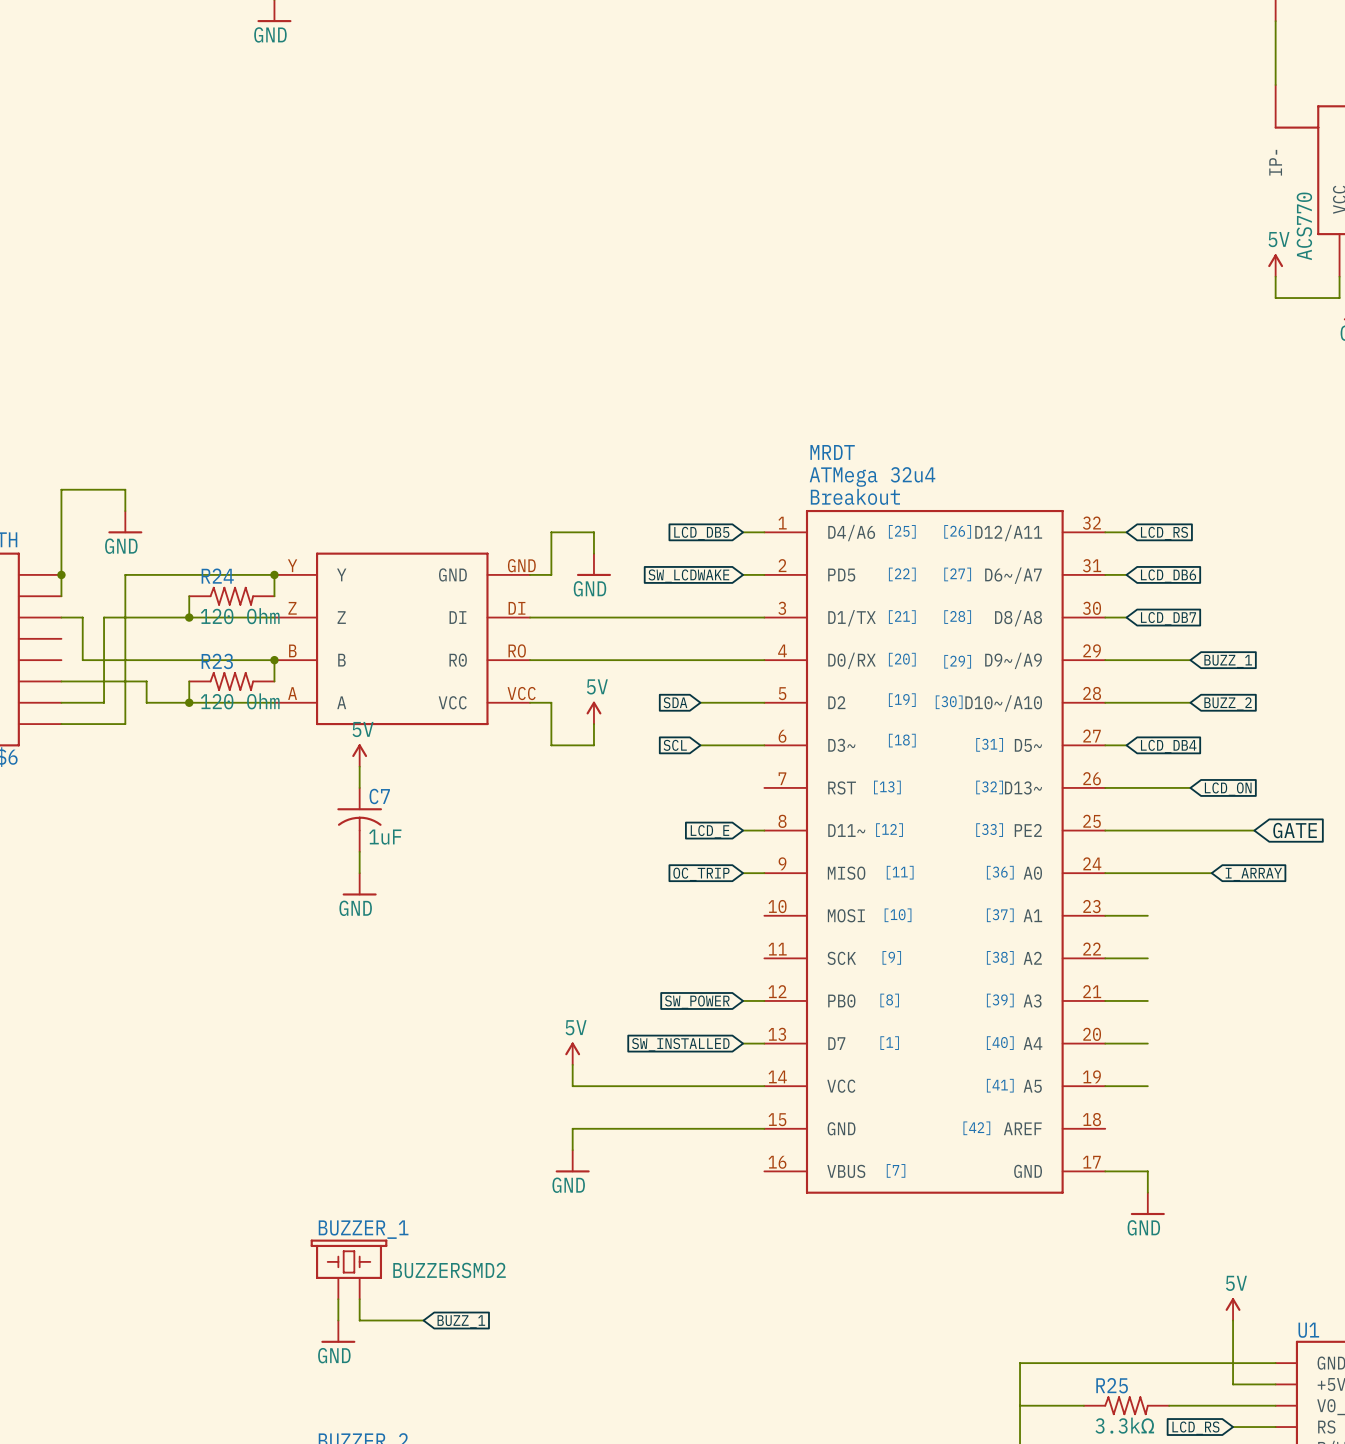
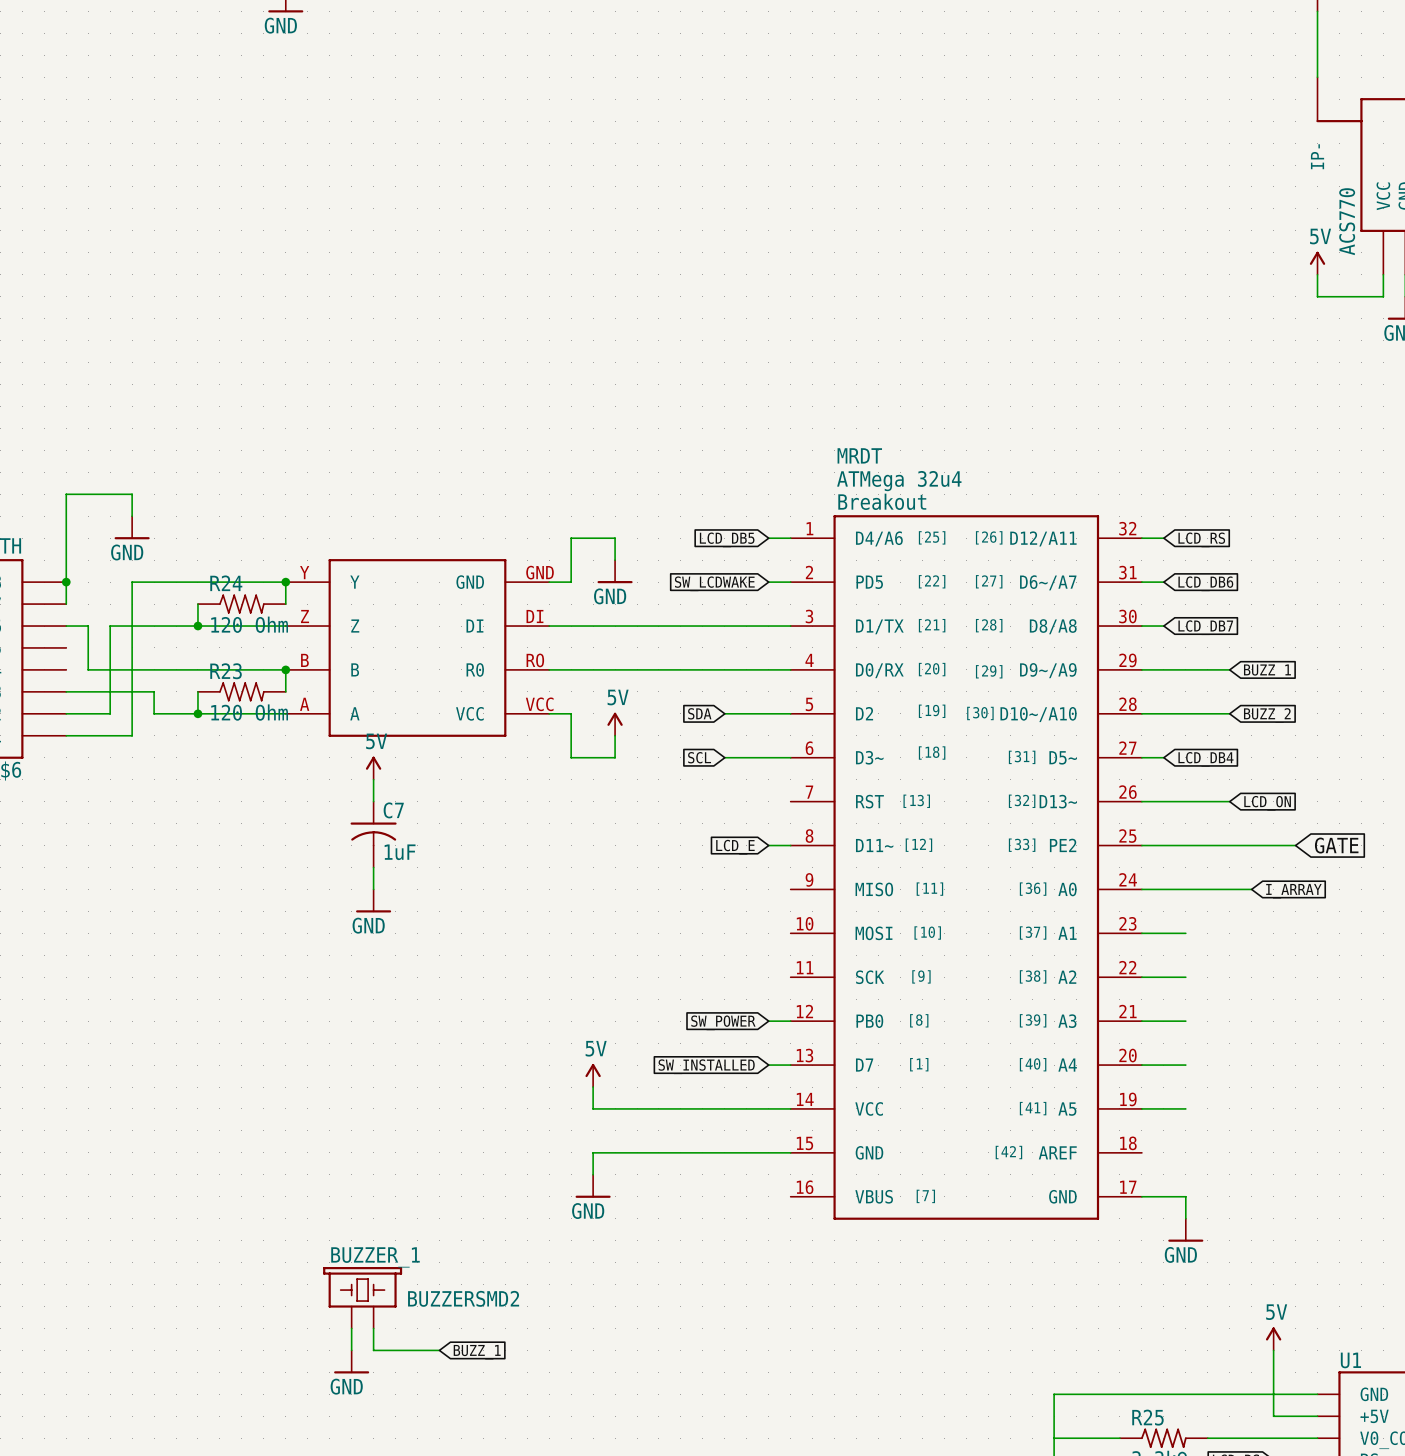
wire: (743, 873) (764, 873) -> none
global label: OC_TRIP (701, 874) -> none

